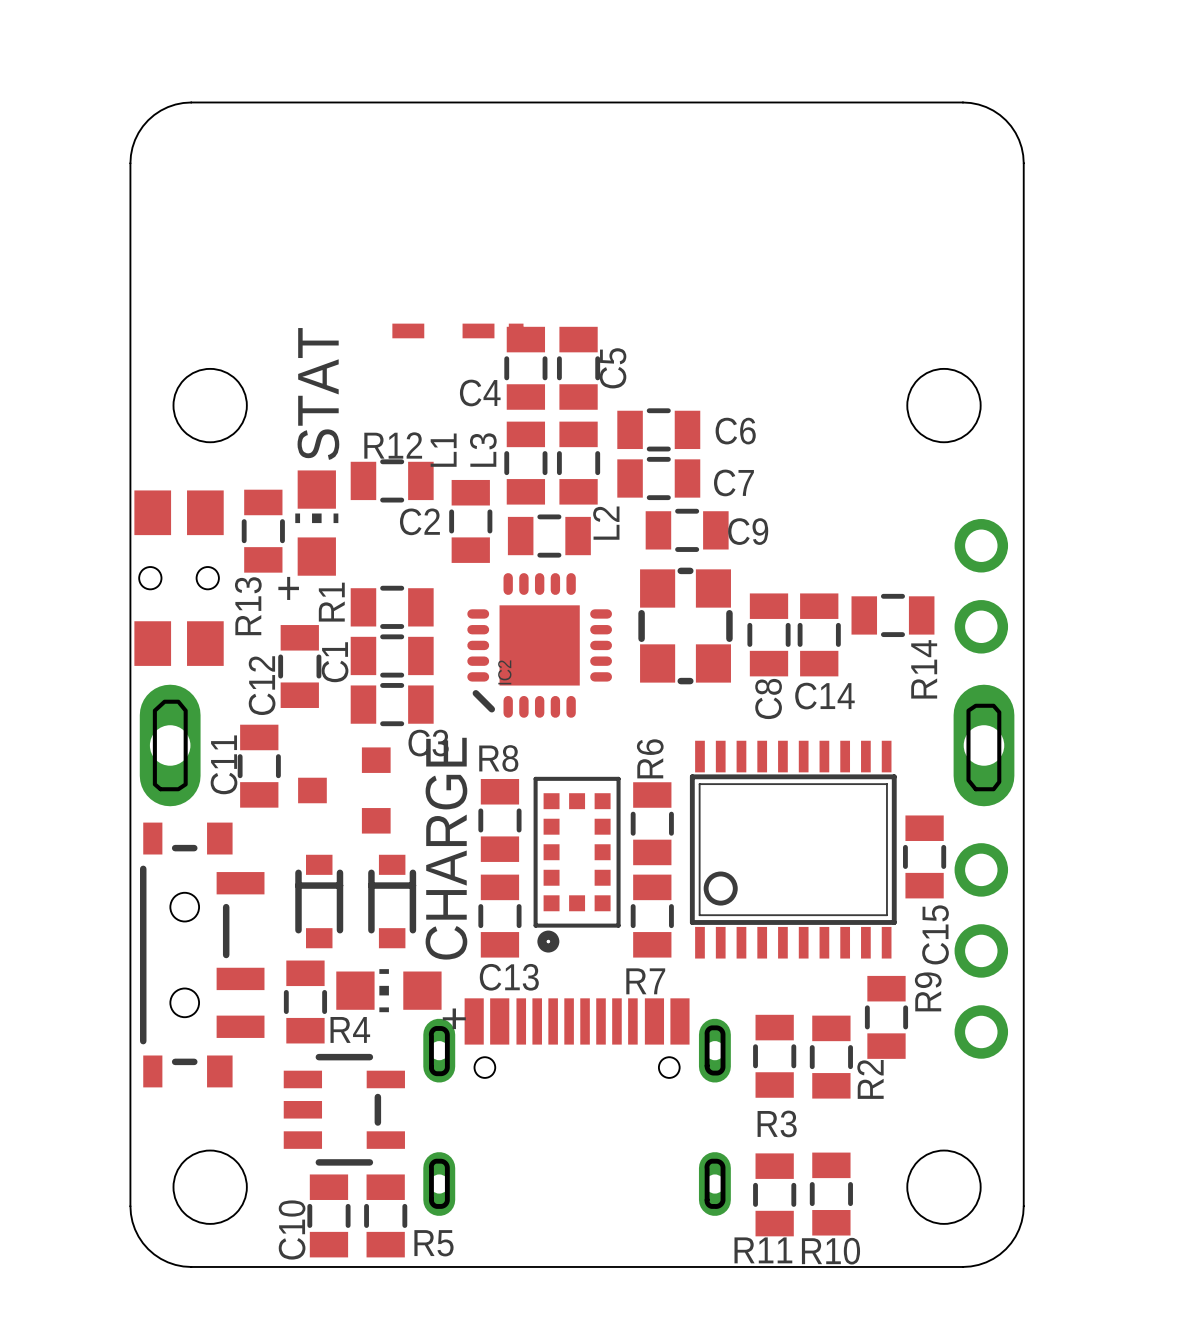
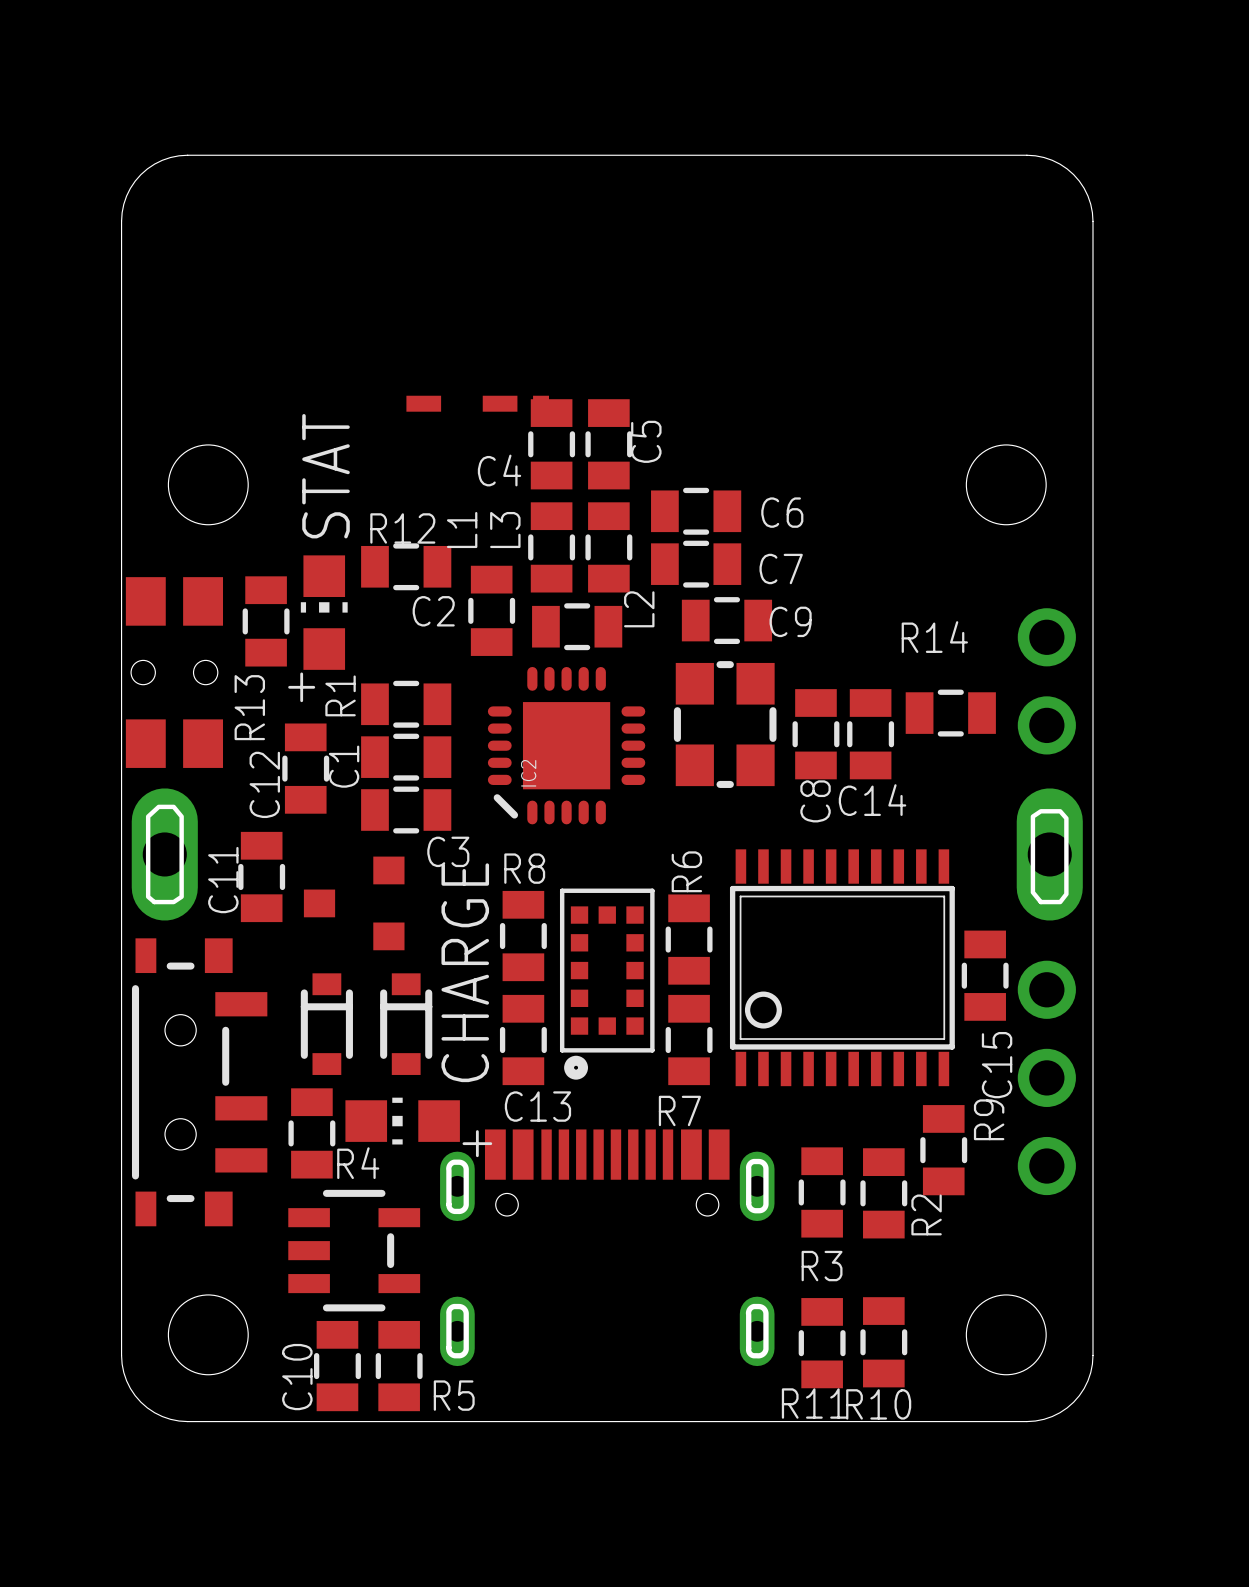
R14 name rotation: 0° (924, 669) -> 90° clockwise (934, 637)
R14 name position: R14 (924, 669) -> R14 (934, 637)

